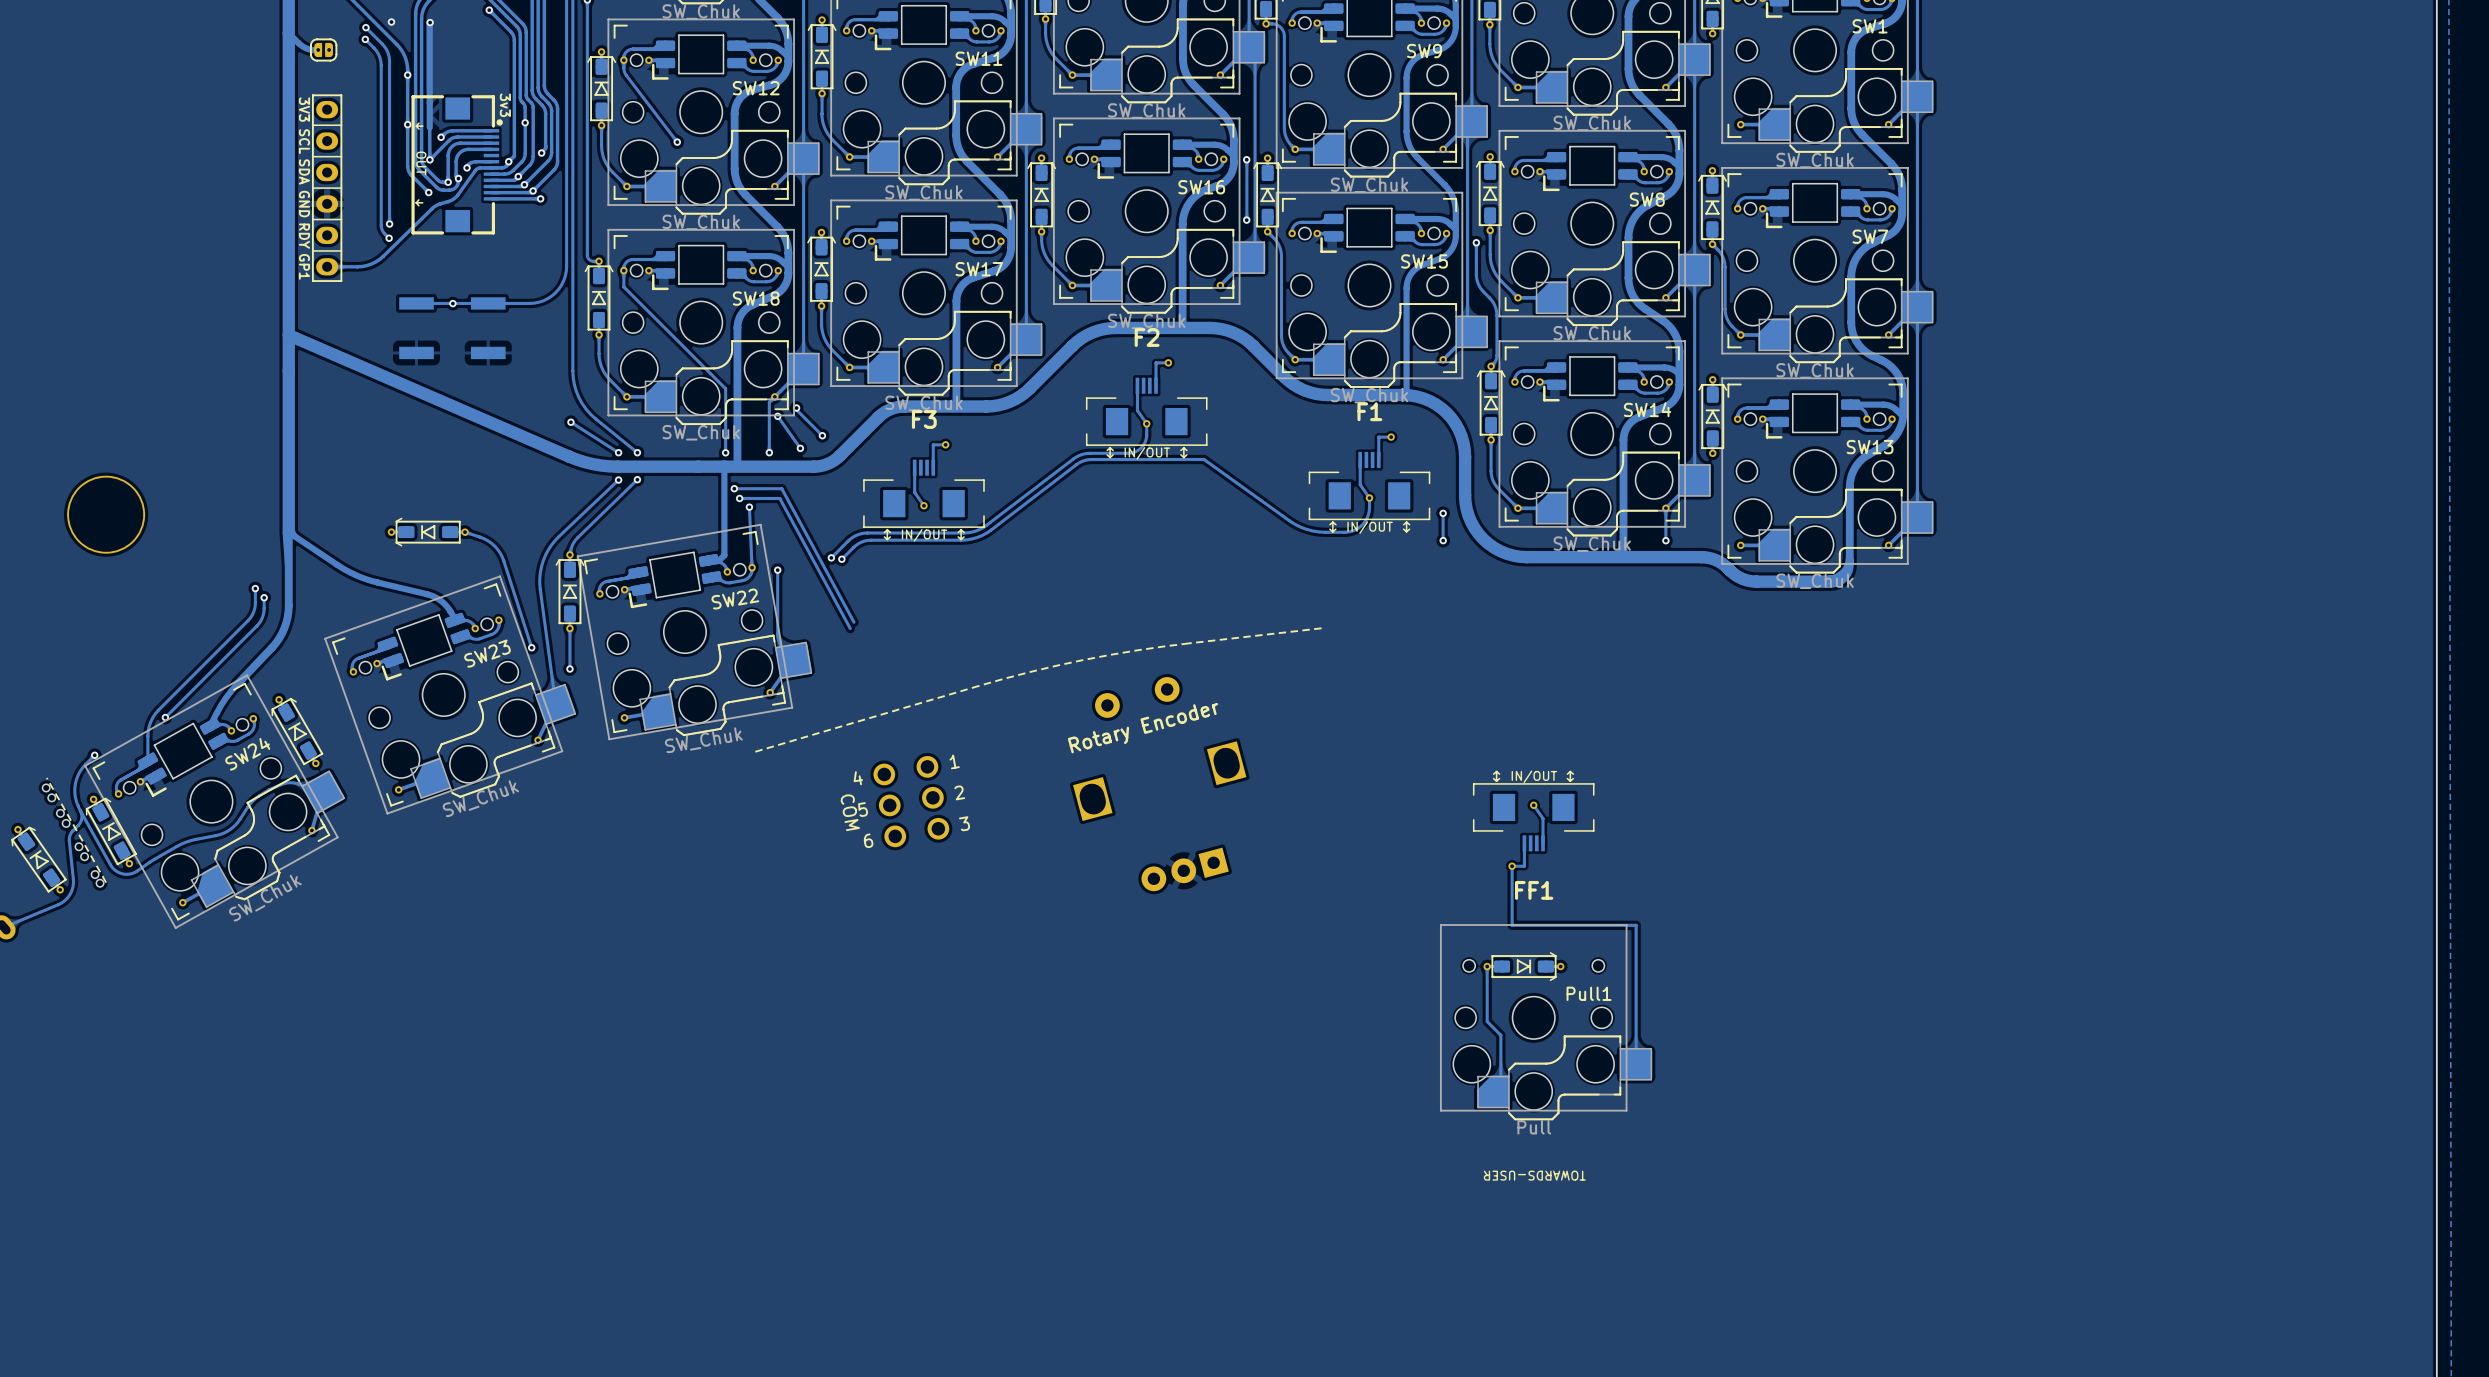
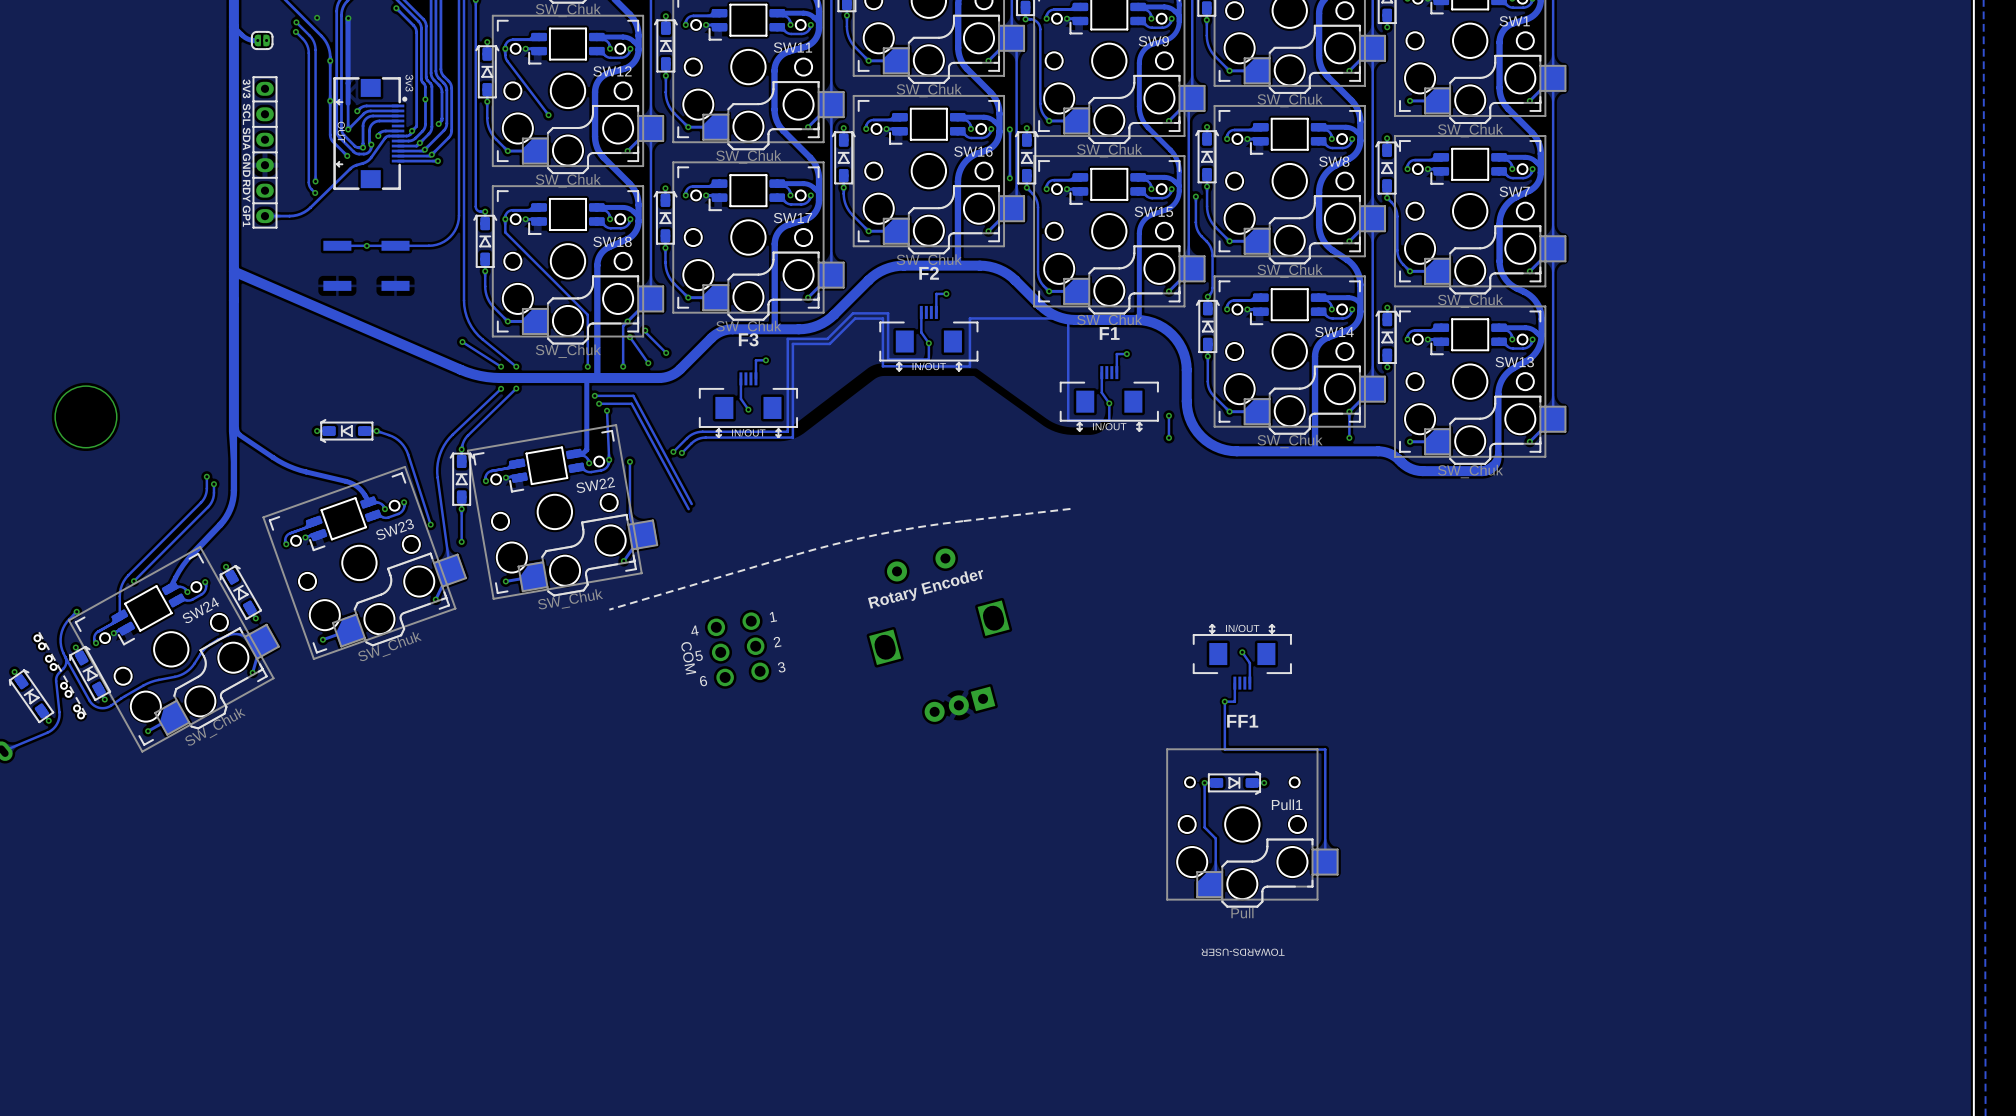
track: (1146, 434) (1142, 446) (1132, 452) (1087, 453) (1075, 457) (983, 527) (963, 533) -> (928, 352) (928, 359) (888, 359) (888, 313) (853, 313) (827, 338) (787, 338) (787, 431) (780, 431)
track: (1369, 507) (1364, 522) (1352, 530) (1312, 530) (1289, 520) (1204, 459) (1088, 459) (1076, 464) (986, 533) (971, 539) (961, 540) -> (1109, 411) (1109, 420) (1068, 420) (1068, 318) (969, 318) (969, 366) (882, 366) (882, 318) (855, 318) (829, 343) (792, 343) (792, 437) (778, 437)

